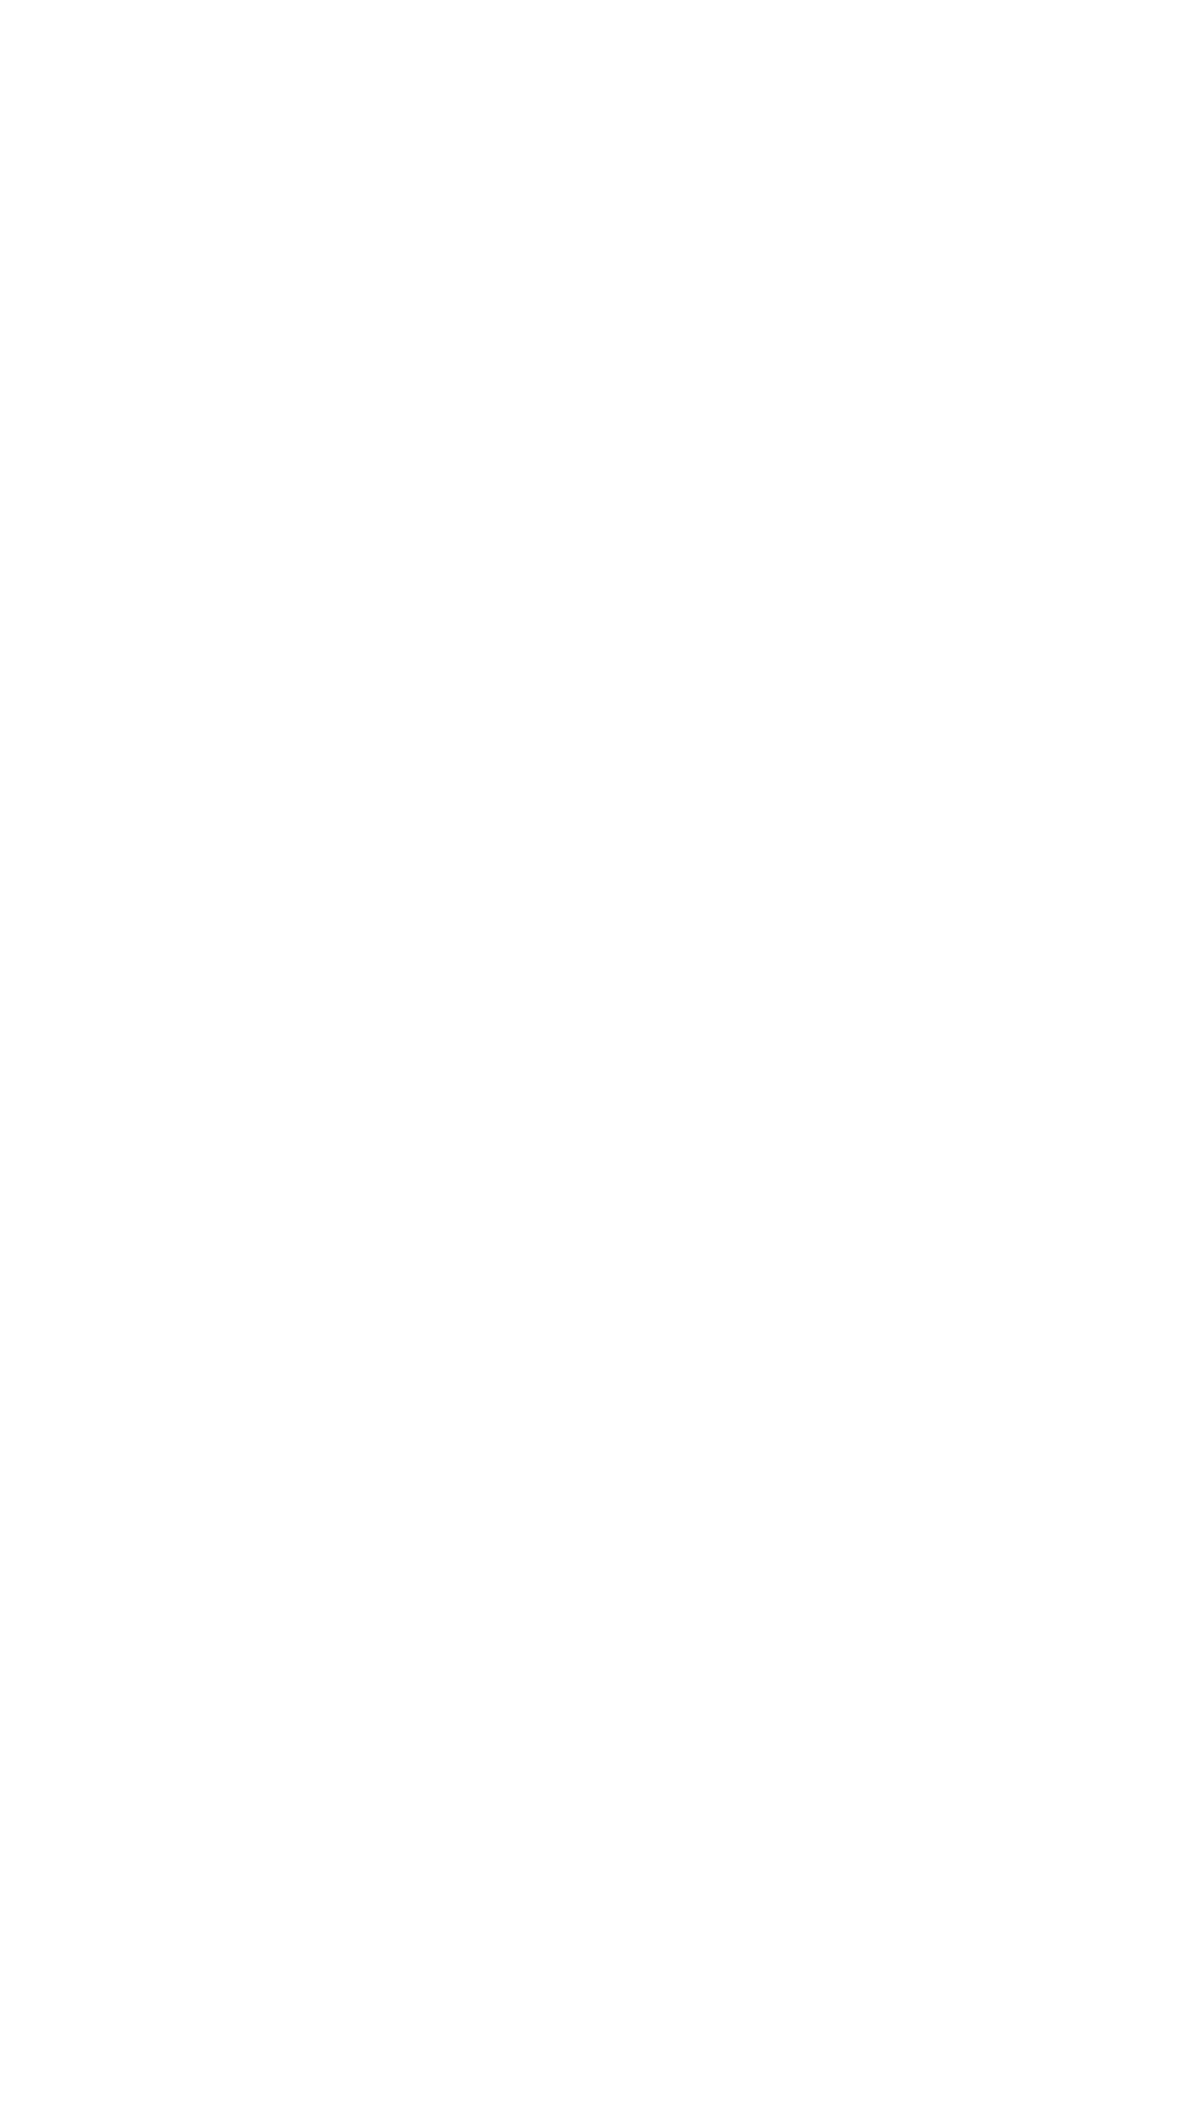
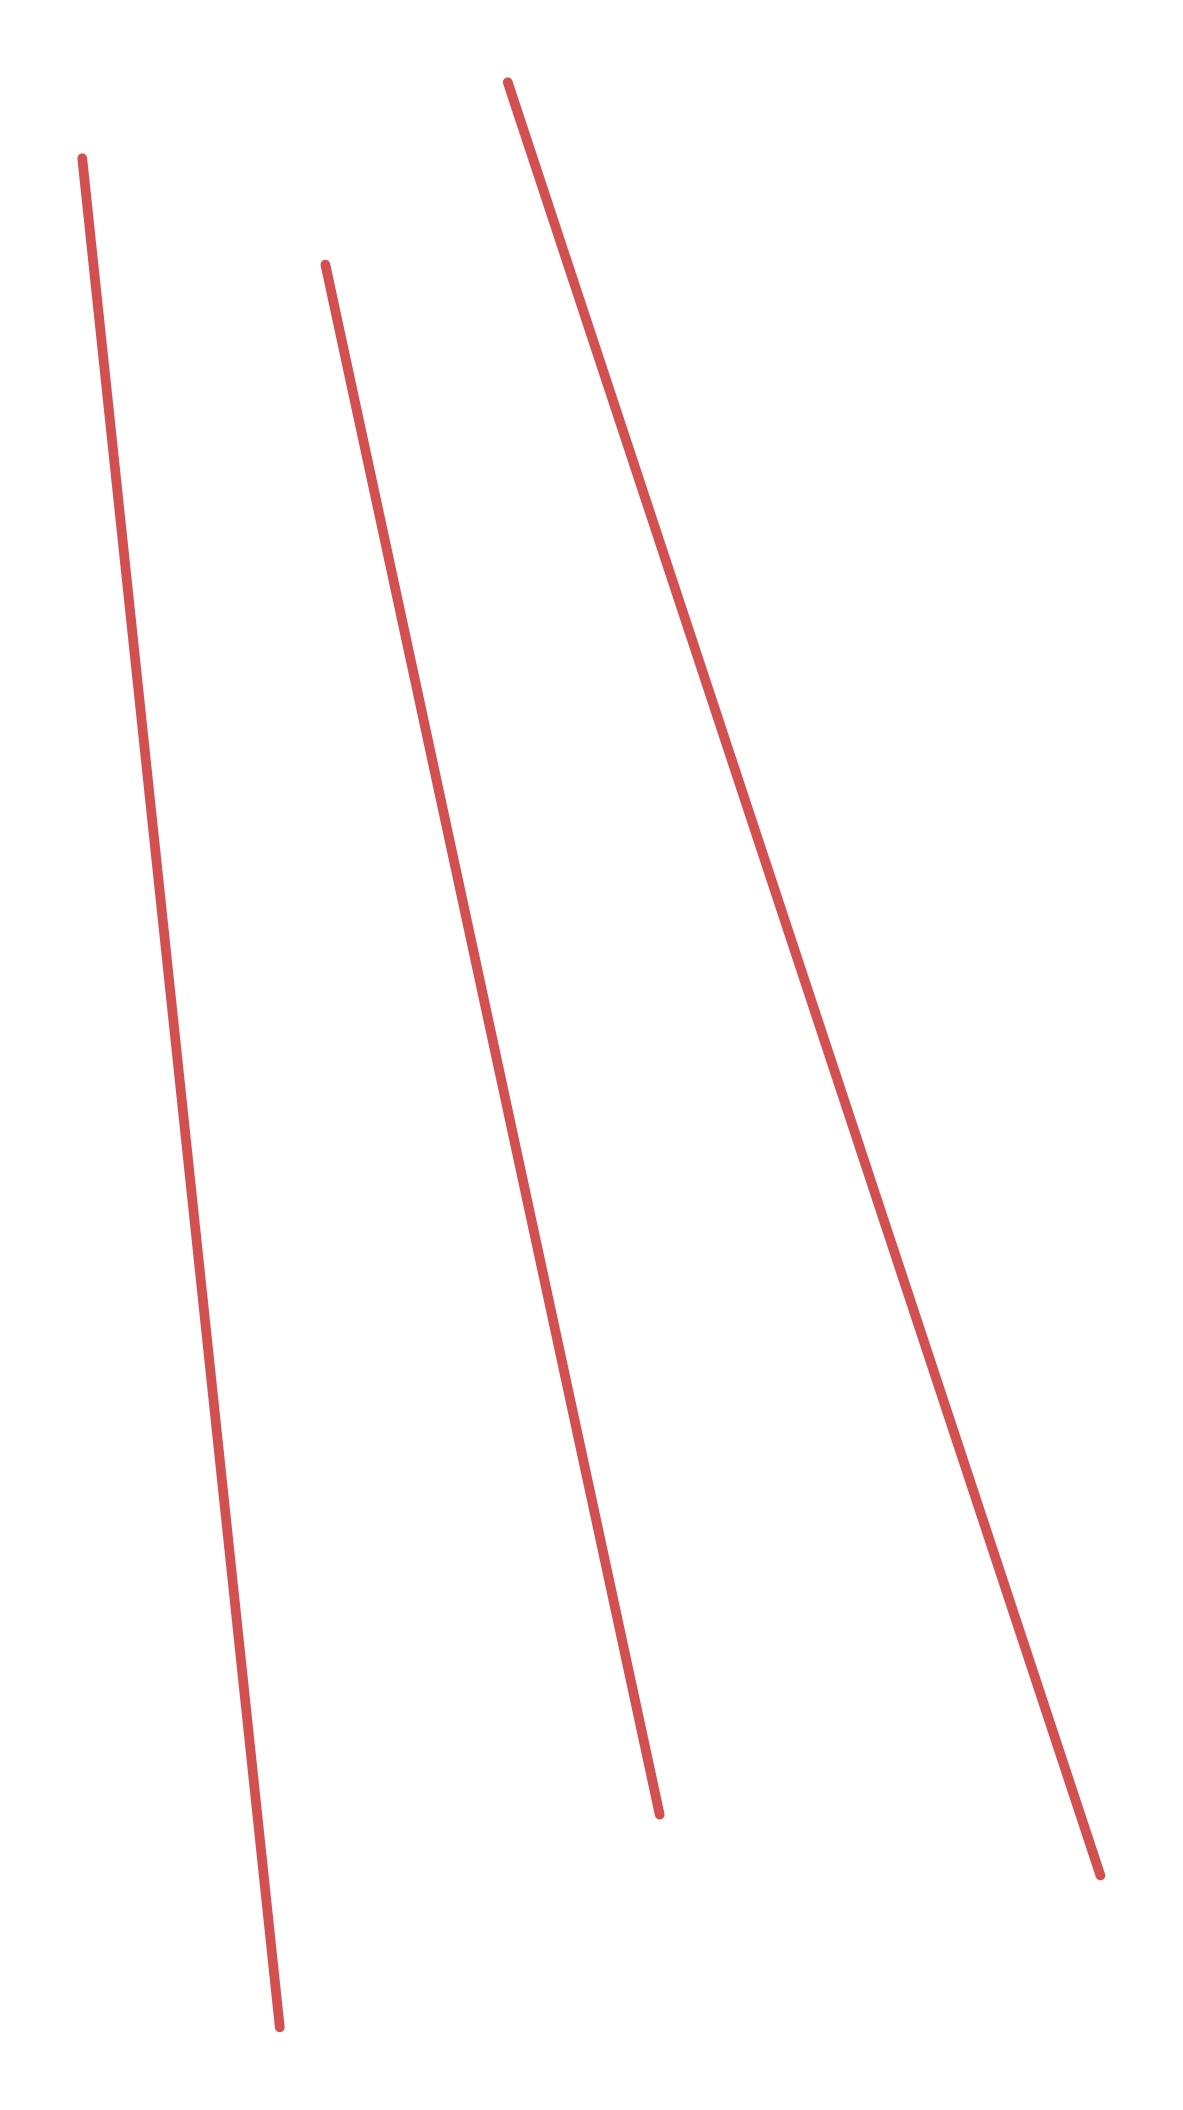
track: none -> (507, 82) (1100, 1875)
track: none -> (82, 158) (279, 2027)
track: none -> (325, 264) (659, 1814)

